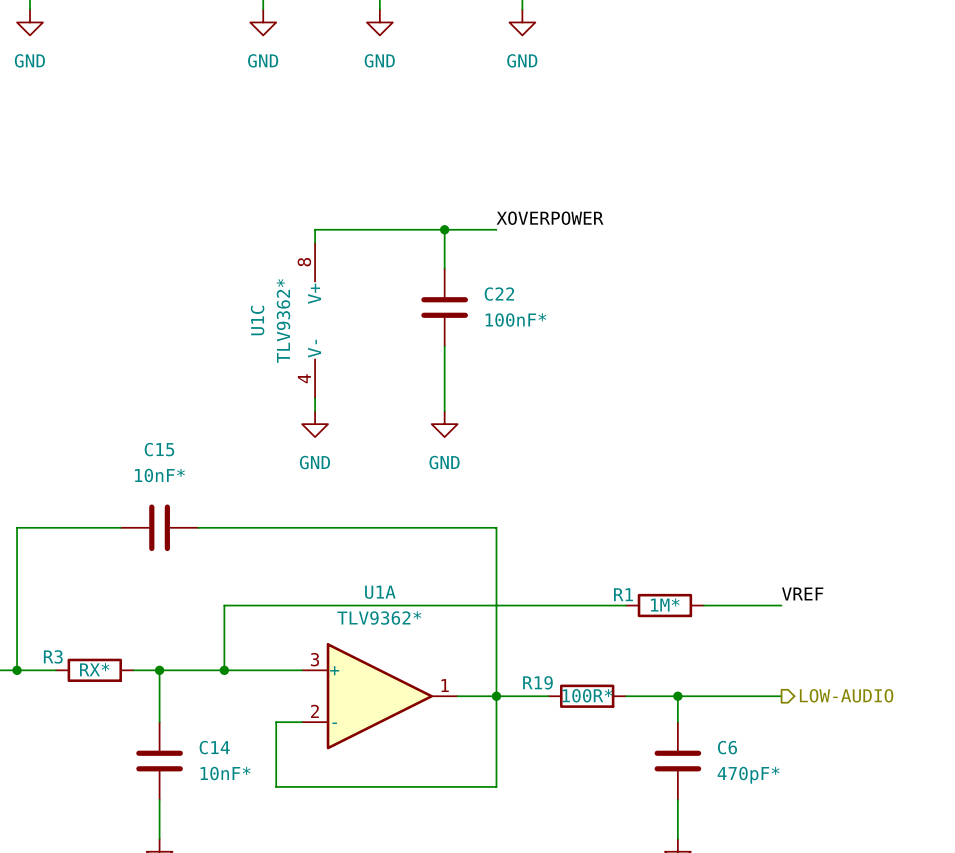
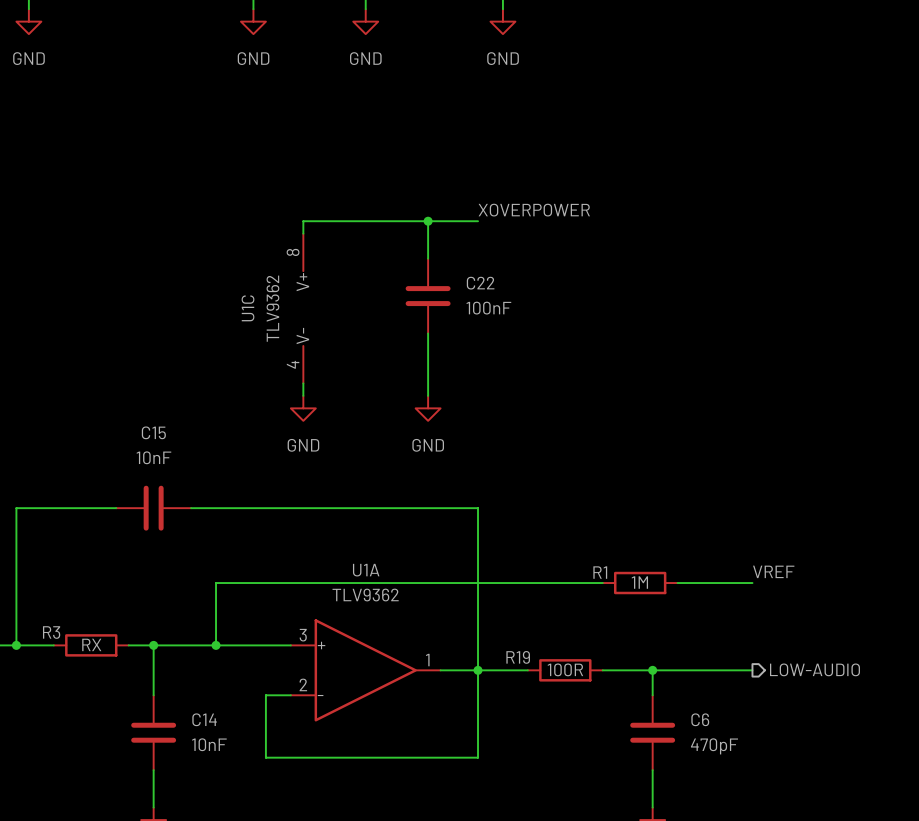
U1C value: TLV9362* (283, 320) -> TLV9362 (272, 308)
C22 value: 100nF* (515, 320) -> 100nF (488, 308)
C15 value: 10nF* (159, 475) -> 10nF (153, 457)
R1 value: 1M* (665, 604) -> 1M (639, 582)
U1A value: TLV9362* (379, 618) -> TLV9362 (365, 595)
R3 value: RX* (94, 669) -> RX (91, 644)
R19 value: 100R* (587, 695) -> 100R (565, 669)
C14 value: 10nF* (225, 773) -> 10nF (209, 744)
C6 value: 470pF* (748, 775) -> 470pF (714, 746)

